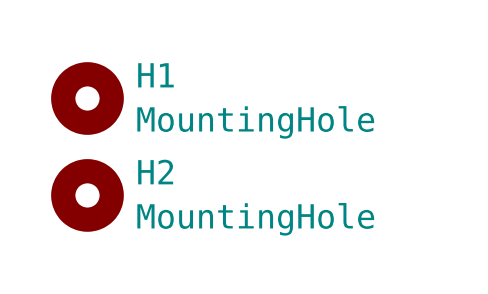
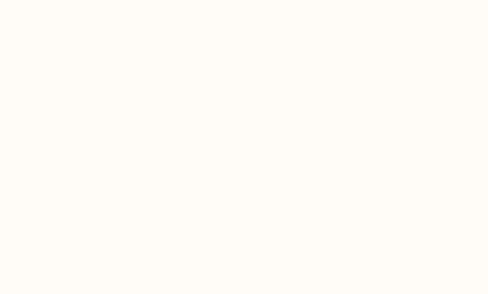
H1: MountingHole (87, 98) -> none
H2: MountingHole (87, 195) -> none

